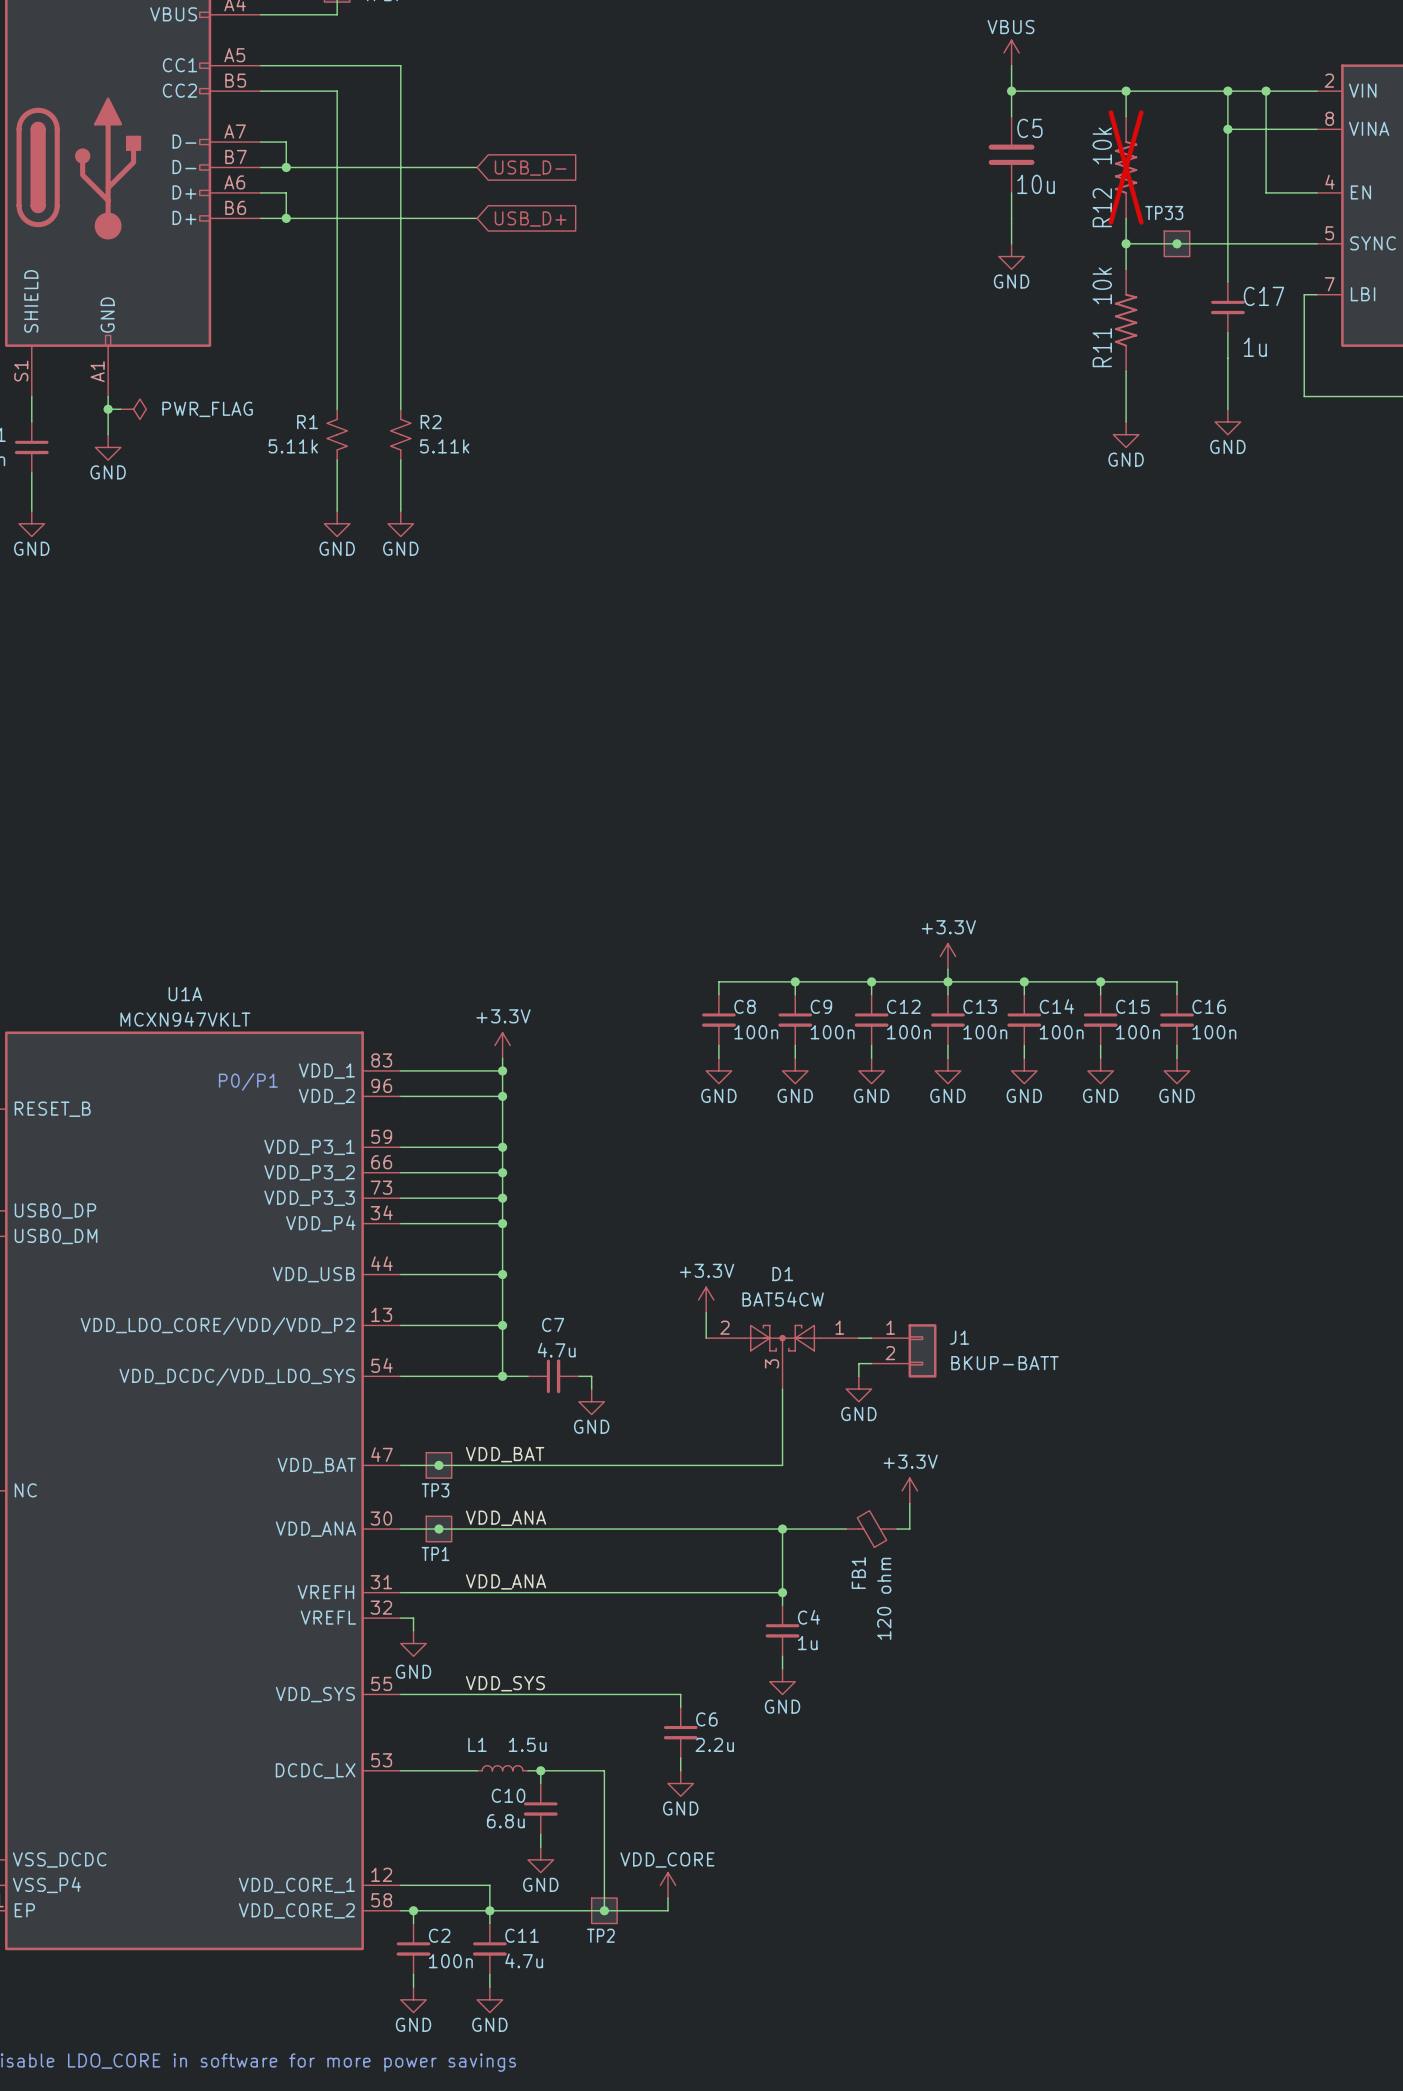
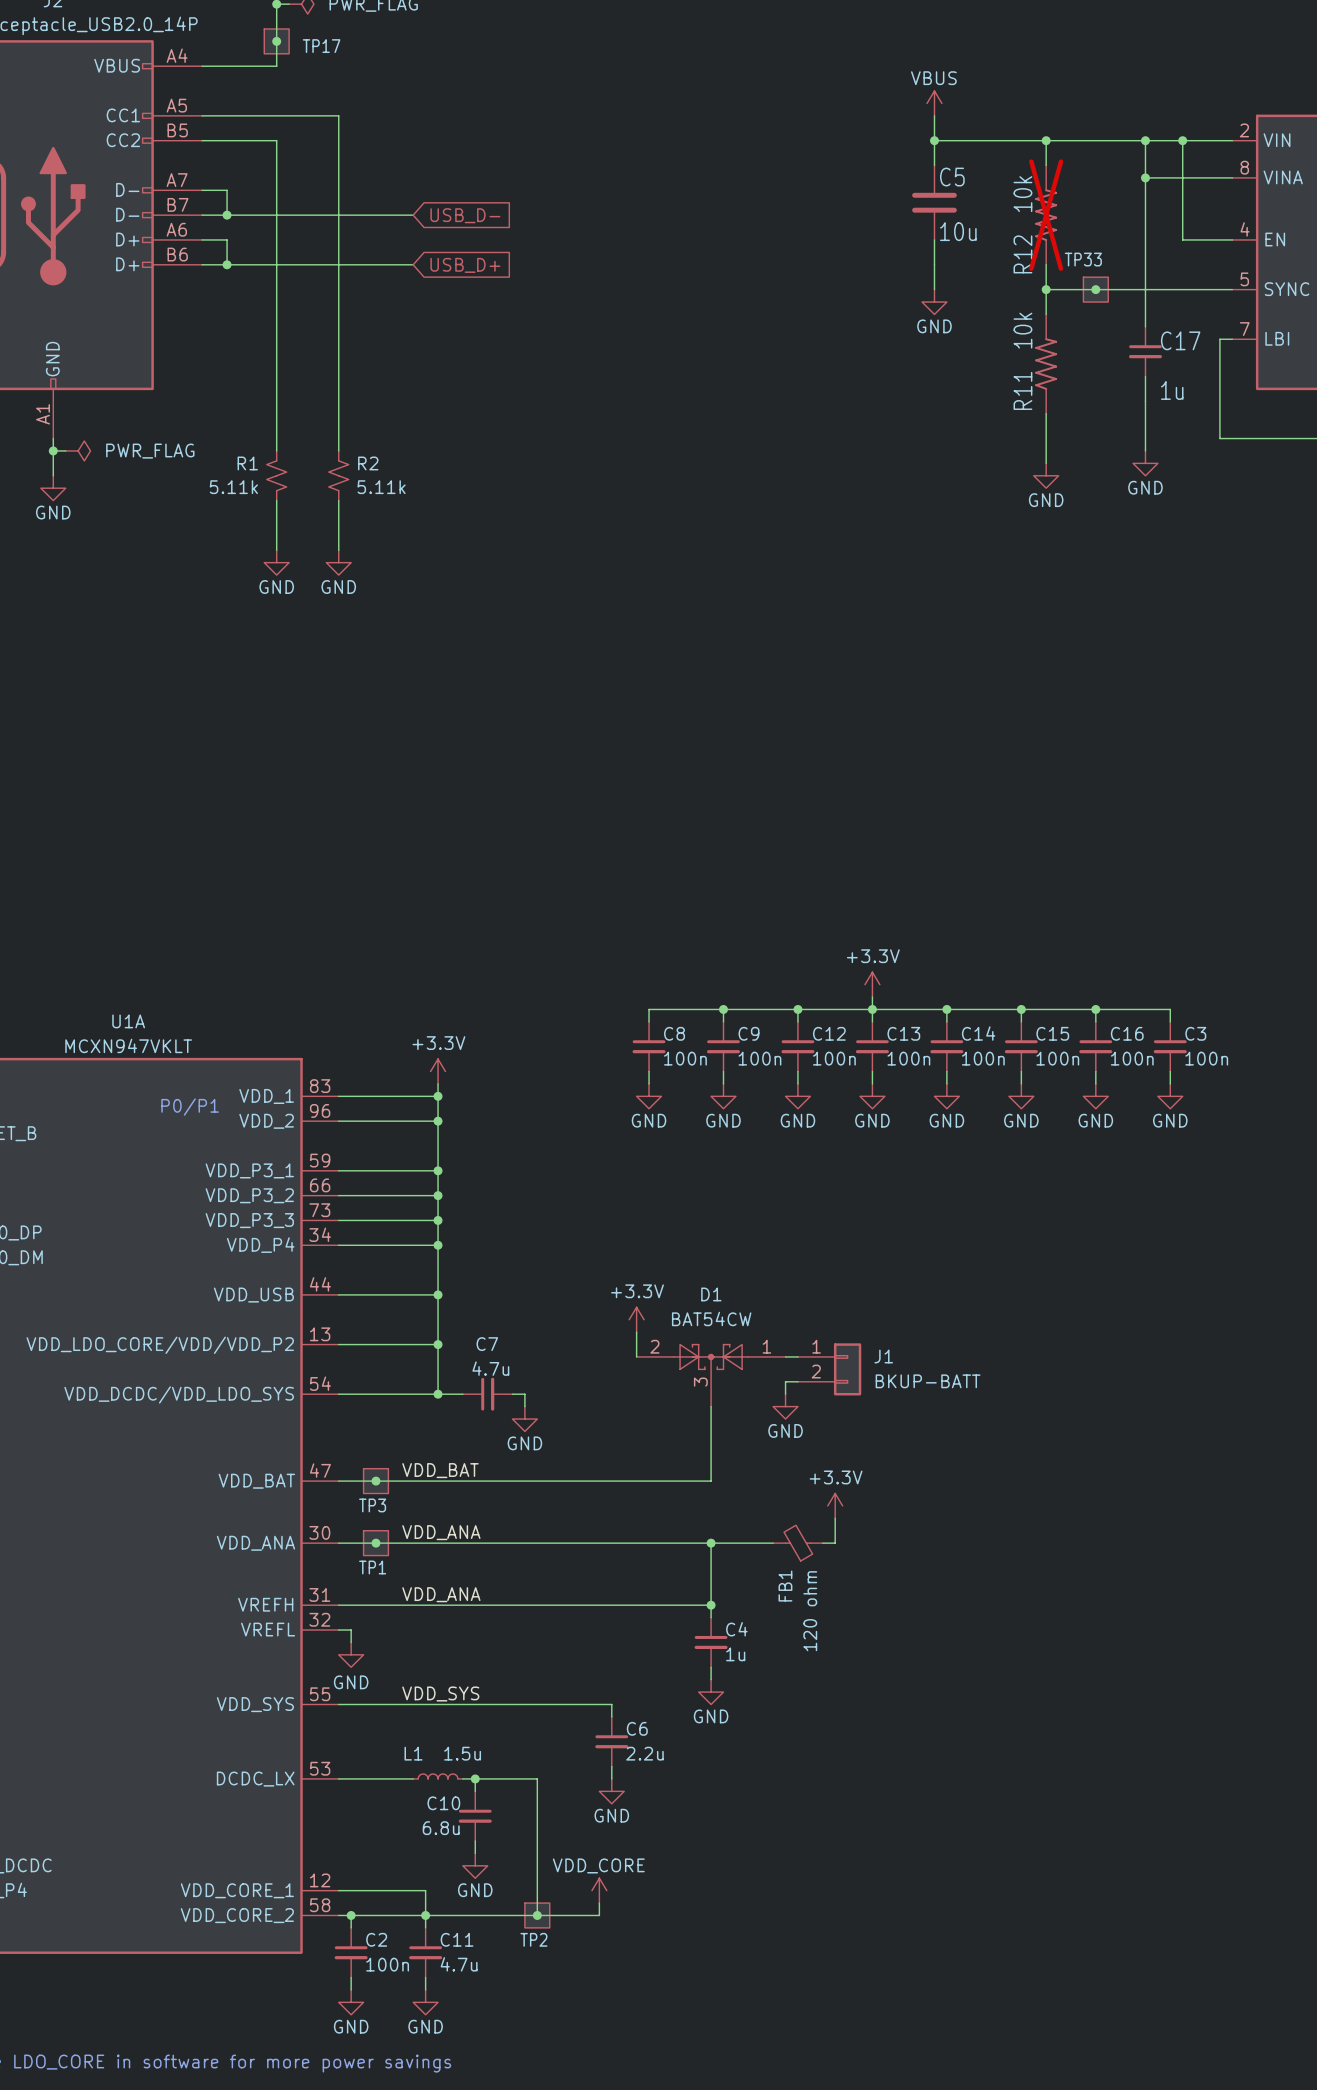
wire: none -> (1095, 1009) (1170, 1009) (1170, 1021)
junction: none -> (1095, 1009)
C3: none -> 100n (1170, 1046)
wire: none -> (1170, 1071) (1170, 1083)
power symbol: none -> GND (1170, 1096)

